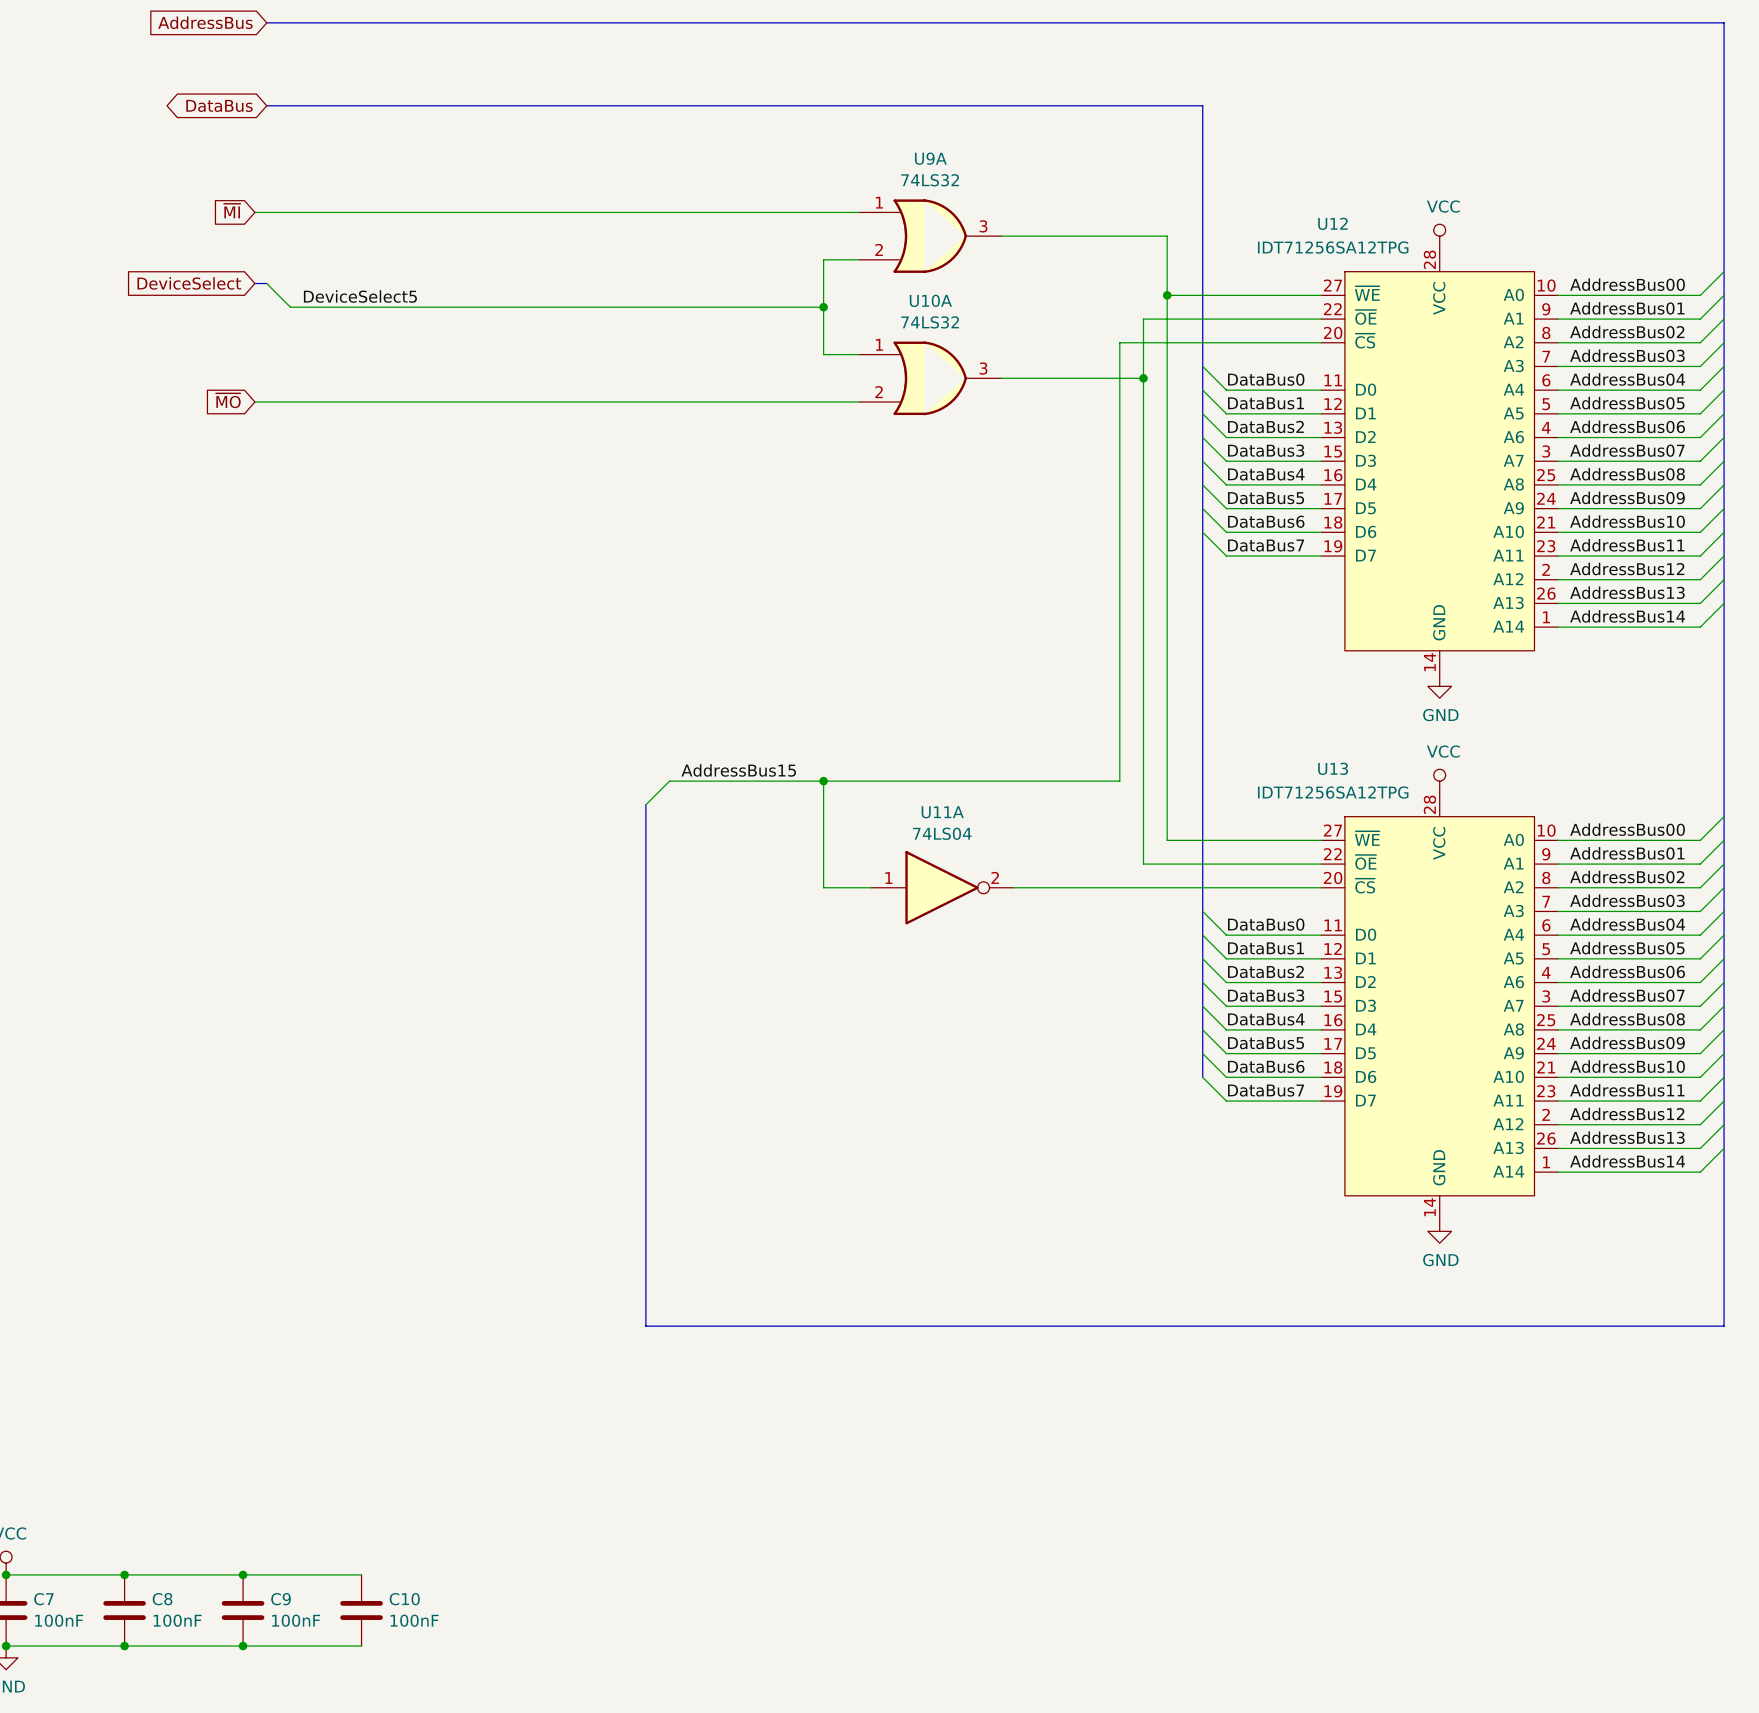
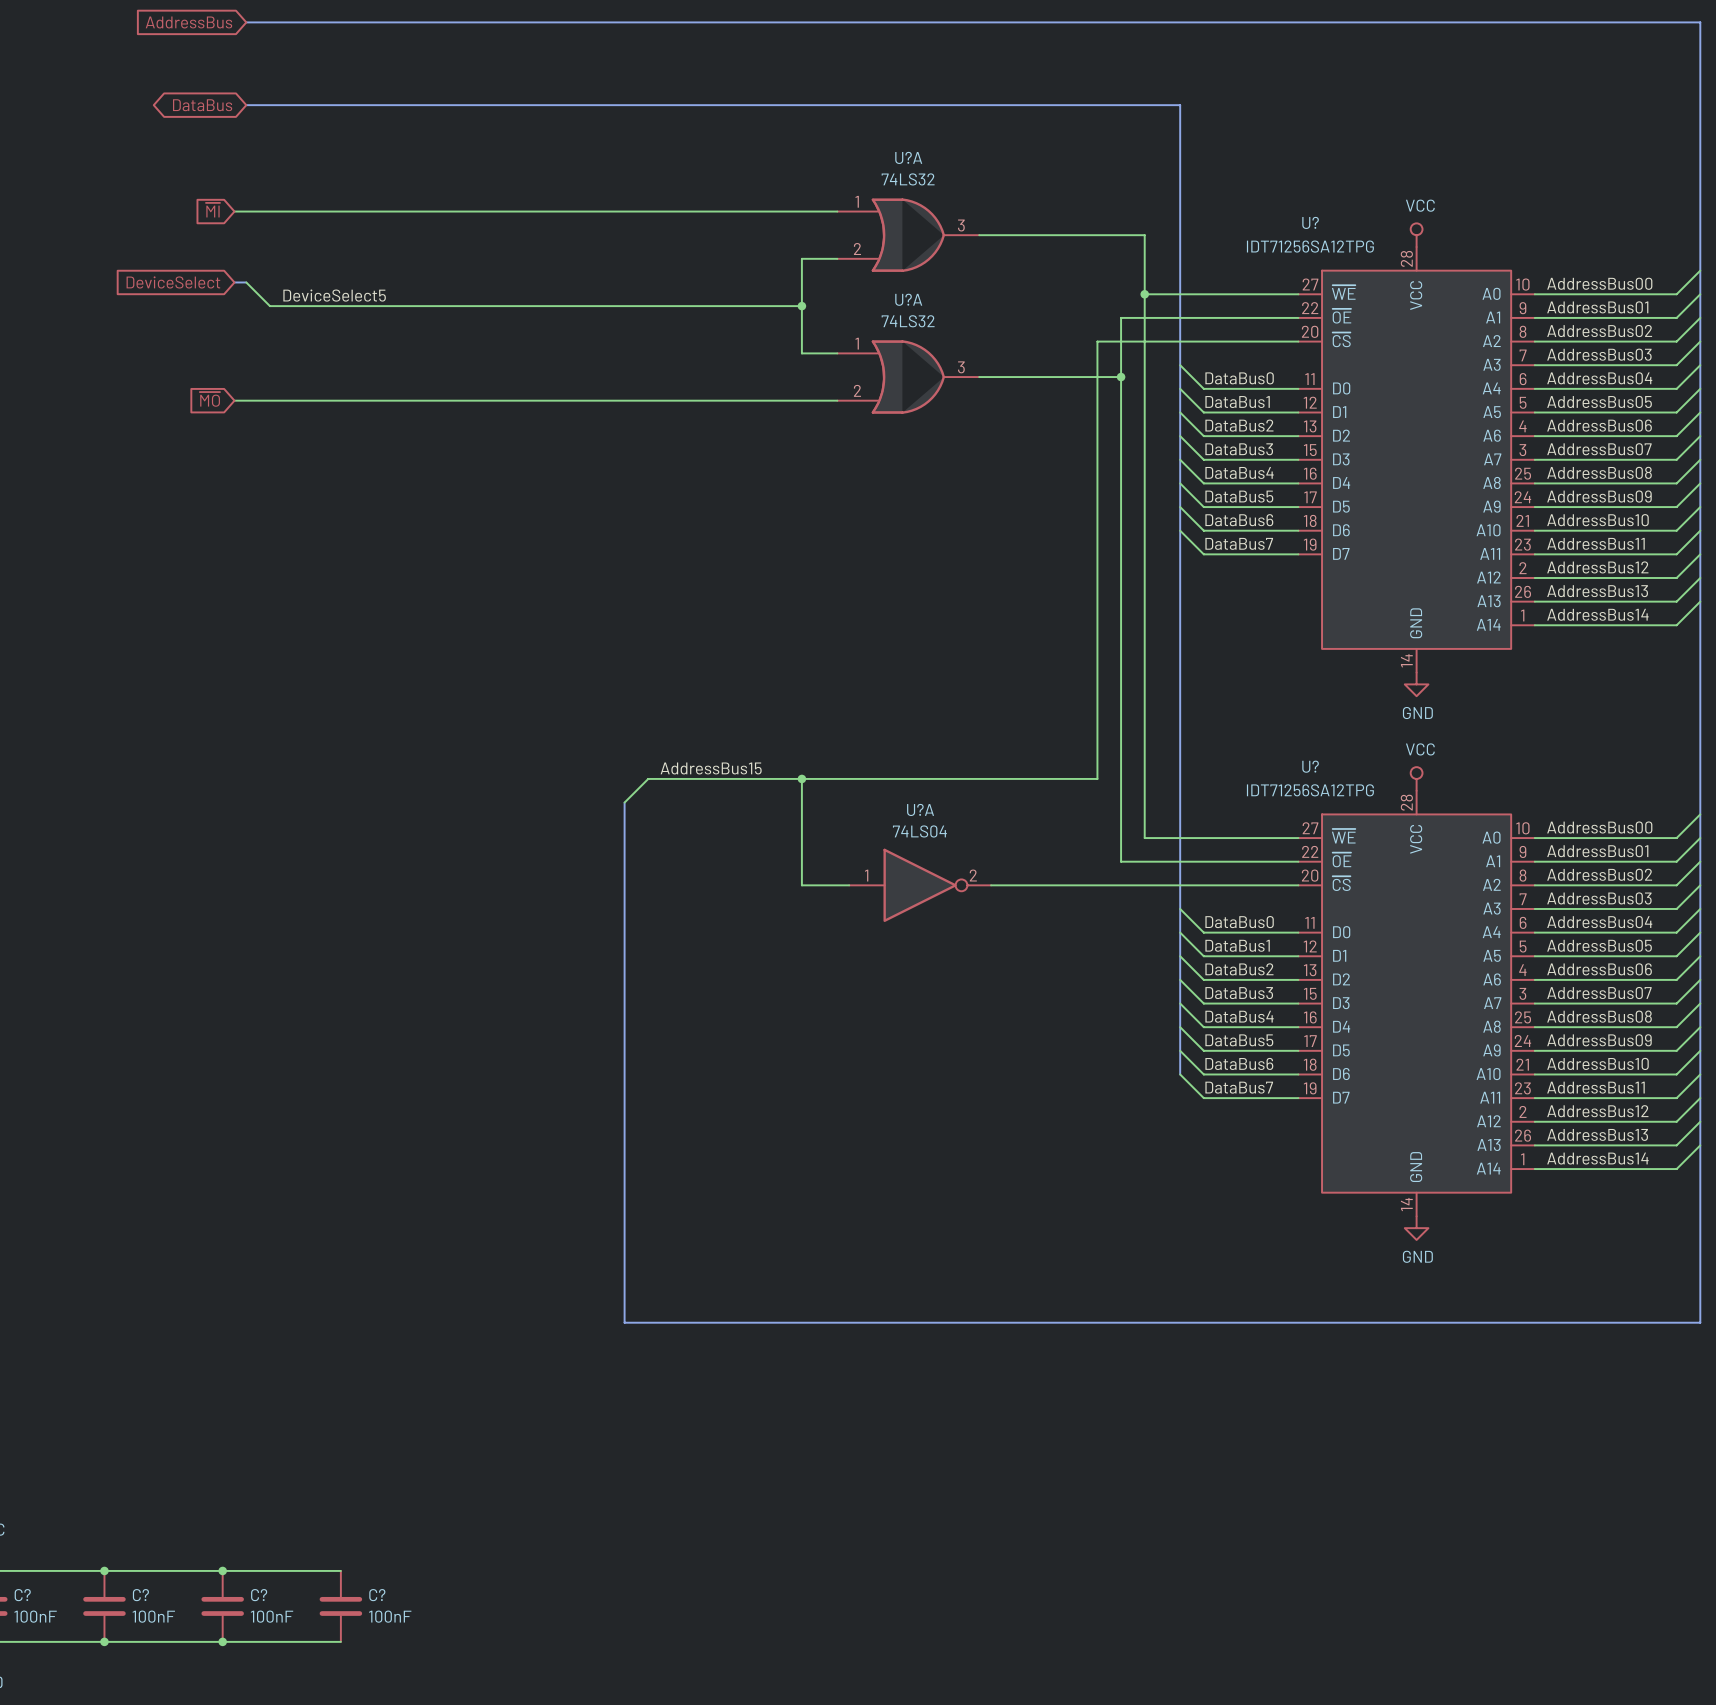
U9A name: U9A (930, 158) -> U?A (908, 157)
U12 name: U12 (1332, 223) -> U? (1310, 222)
U10A name: U10A (930, 300) -> U?A (908, 299)
U13 name: U13 (1333, 768) -> U? (1310, 766)
U11A name: U11A (942, 812) -> U?A (920, 809)
C7 name: C7 (43, 1599) -> C? (22, 1595)
C8 name: C8 (162, 1599) -> C? (140, 1595)
C9 name: C9 (281, 1599) -> C? (259, 1595)
C10 name: C10 (404, 1599) -> C? (377, 1595)

